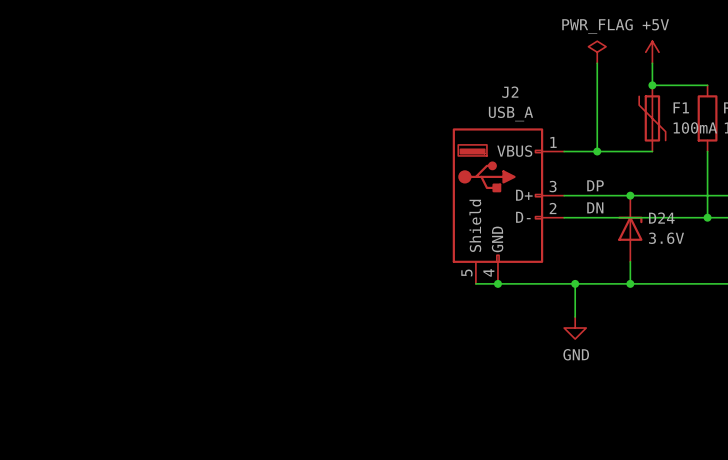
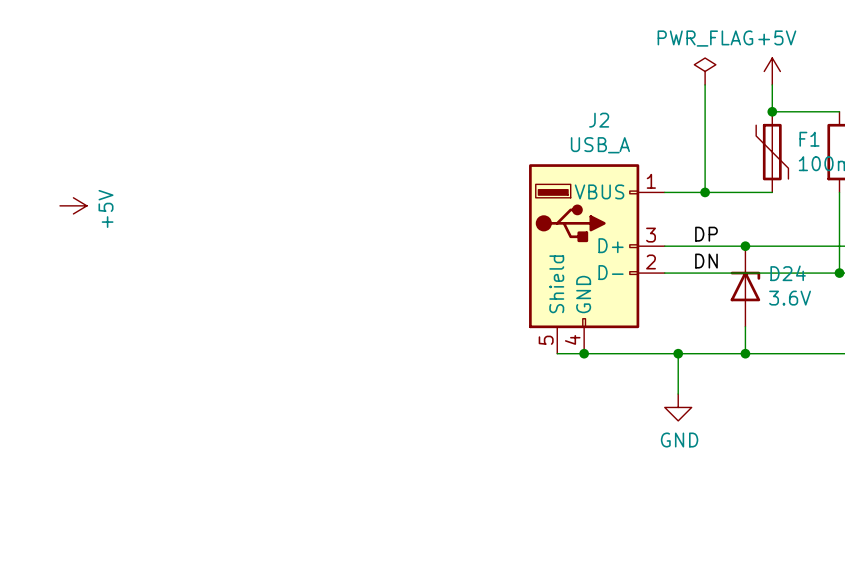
power symbol: none -> +5V (73, 205)

